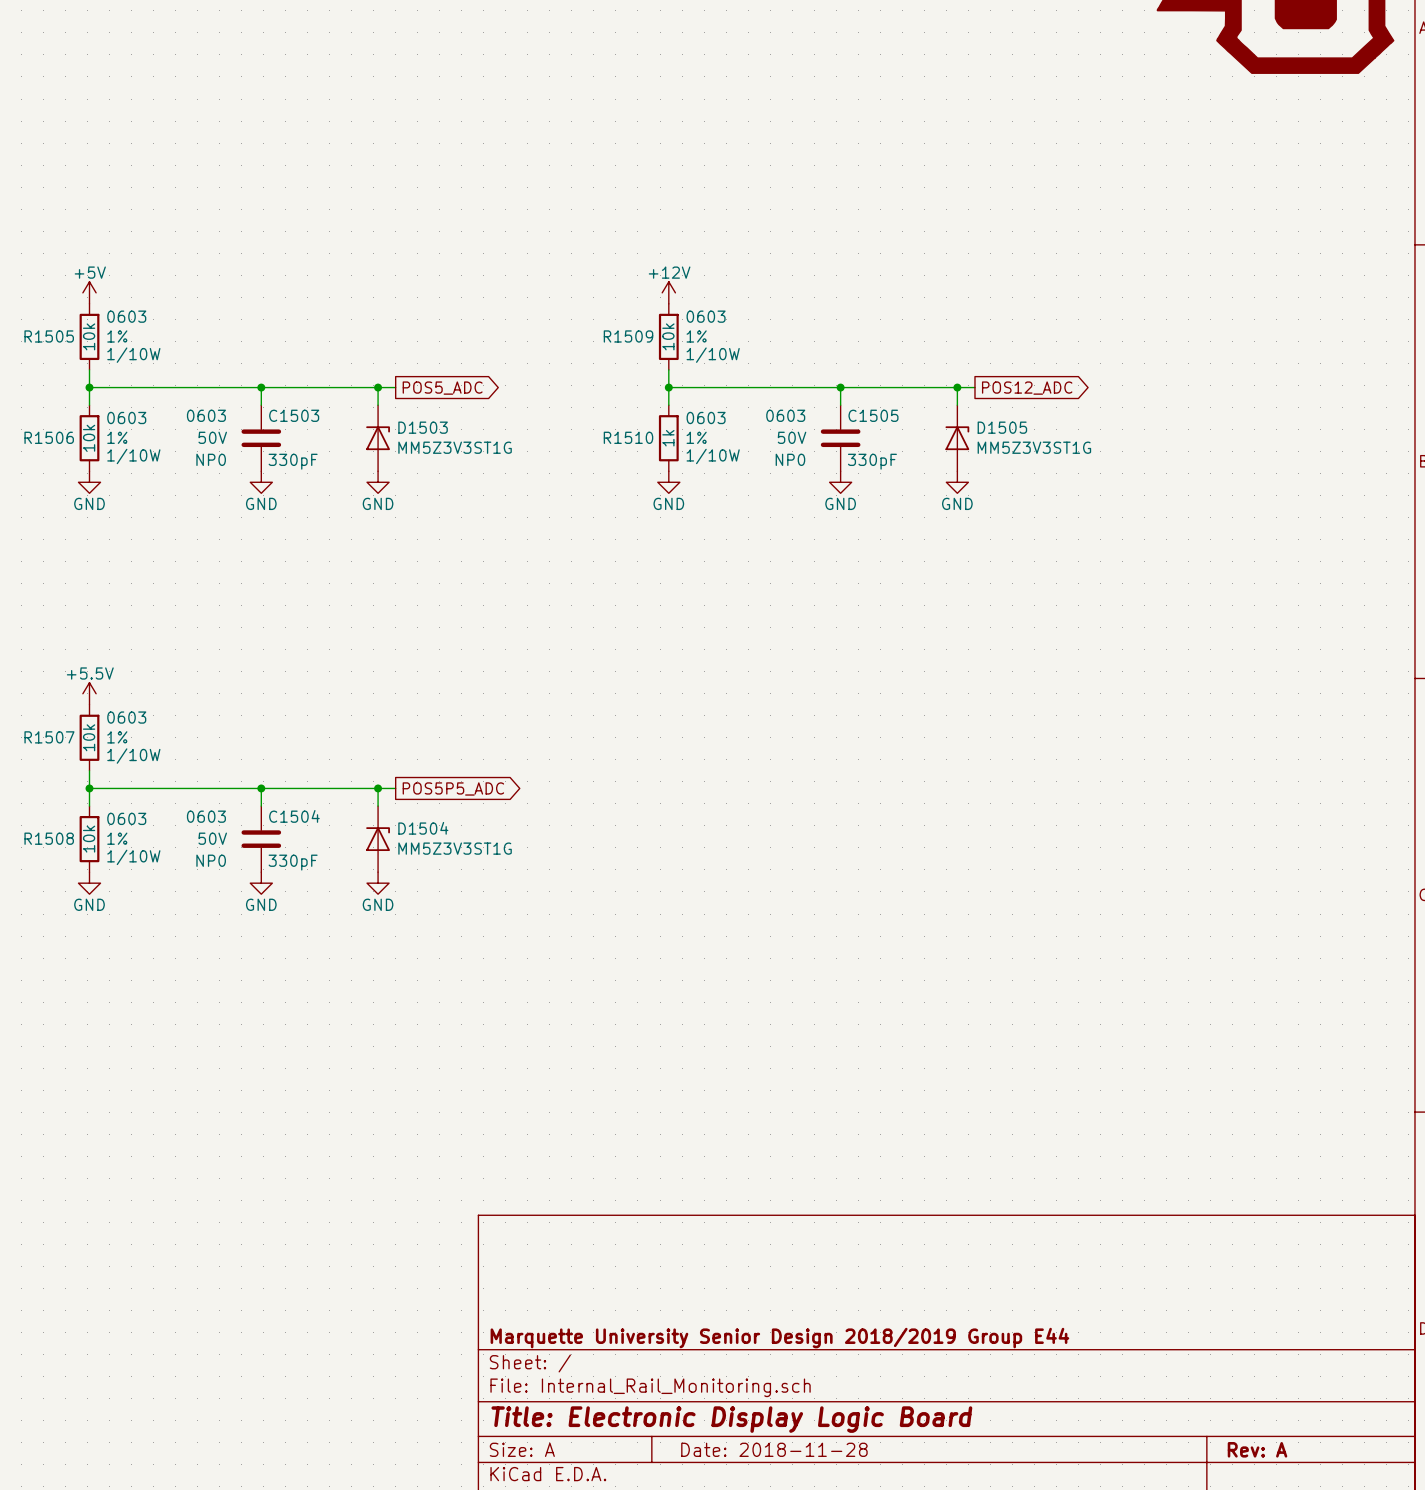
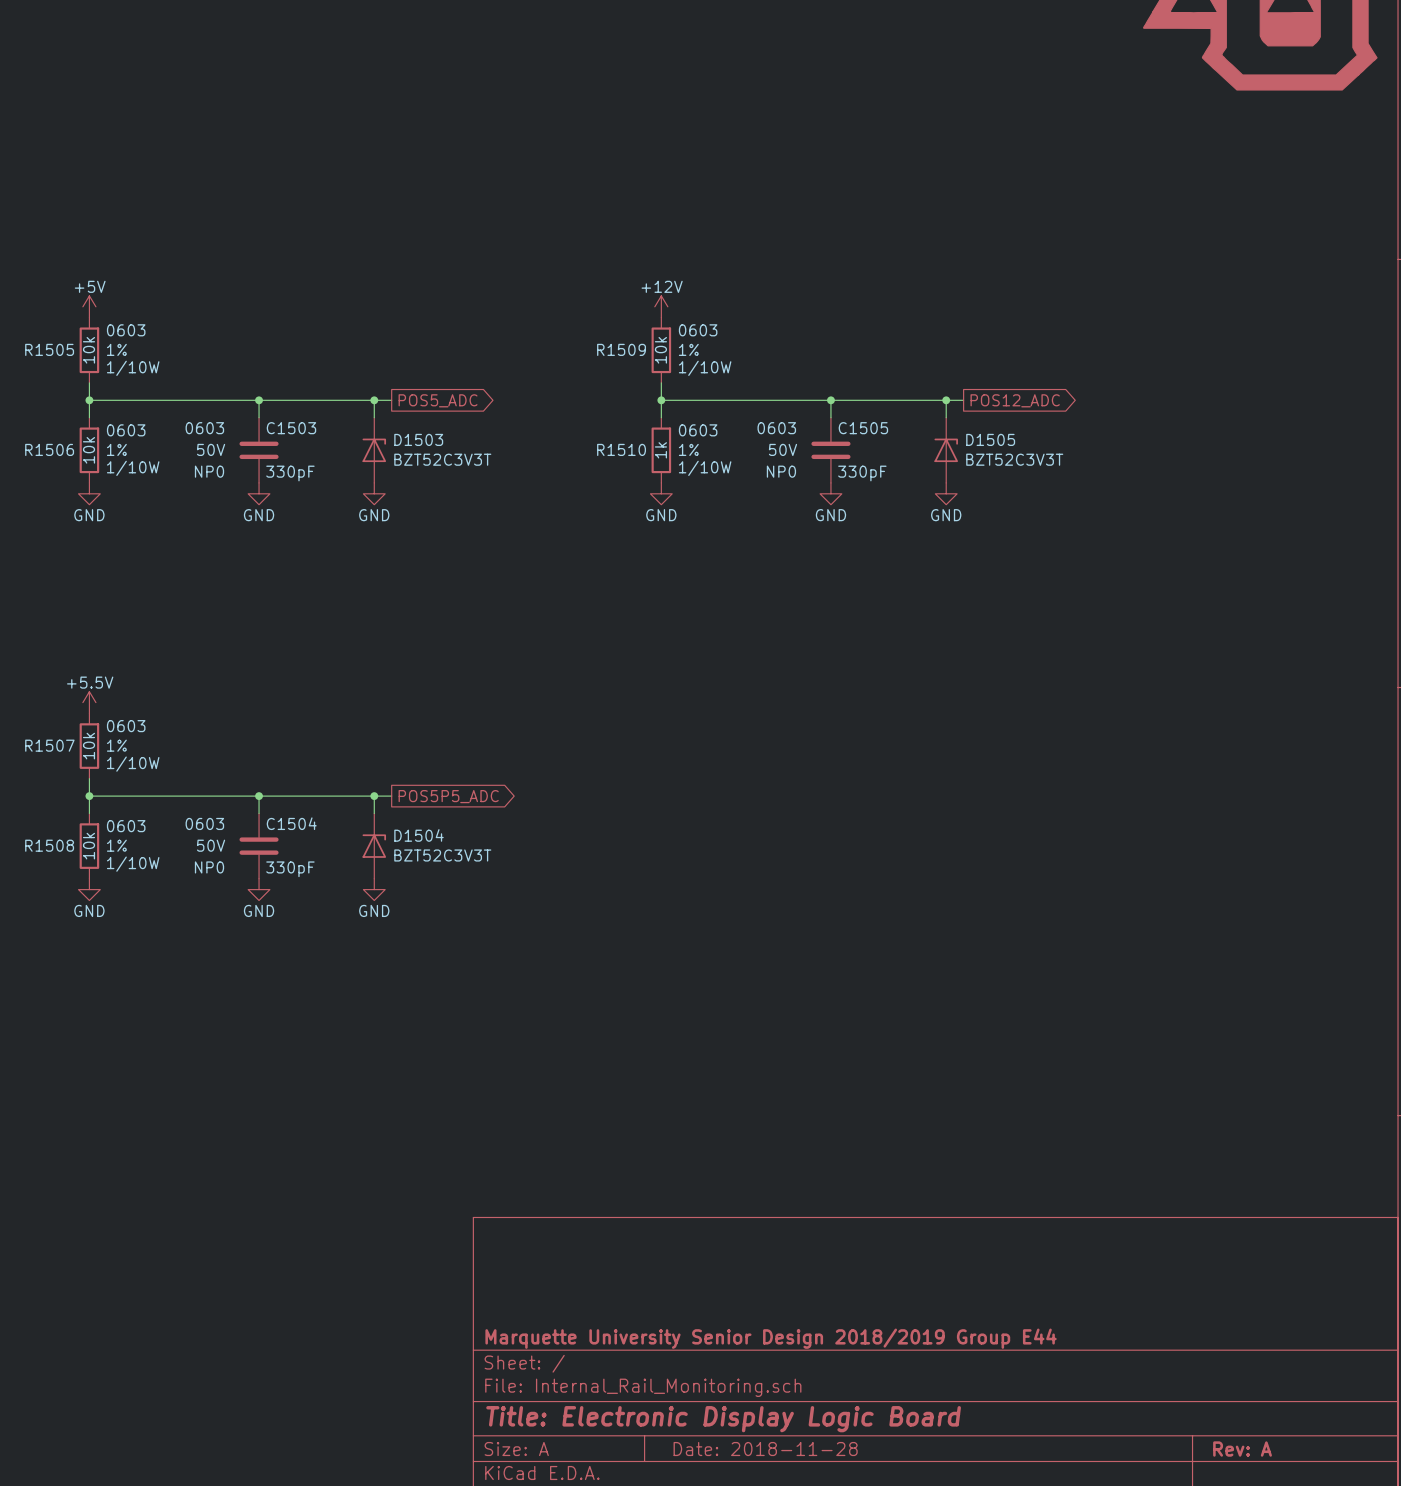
D1503 value: MM5Z3V3ST1G (455, 447) -> BZT52C3V3T (442, 459)
D1505 value: MM5Z3V3ST1G (1034, 447) -> BZT52C3V3T (1014, 459)
D1504 value: MM5Z3V3ST1G (455, 848) -> BZT52C3V3T (442, 855)

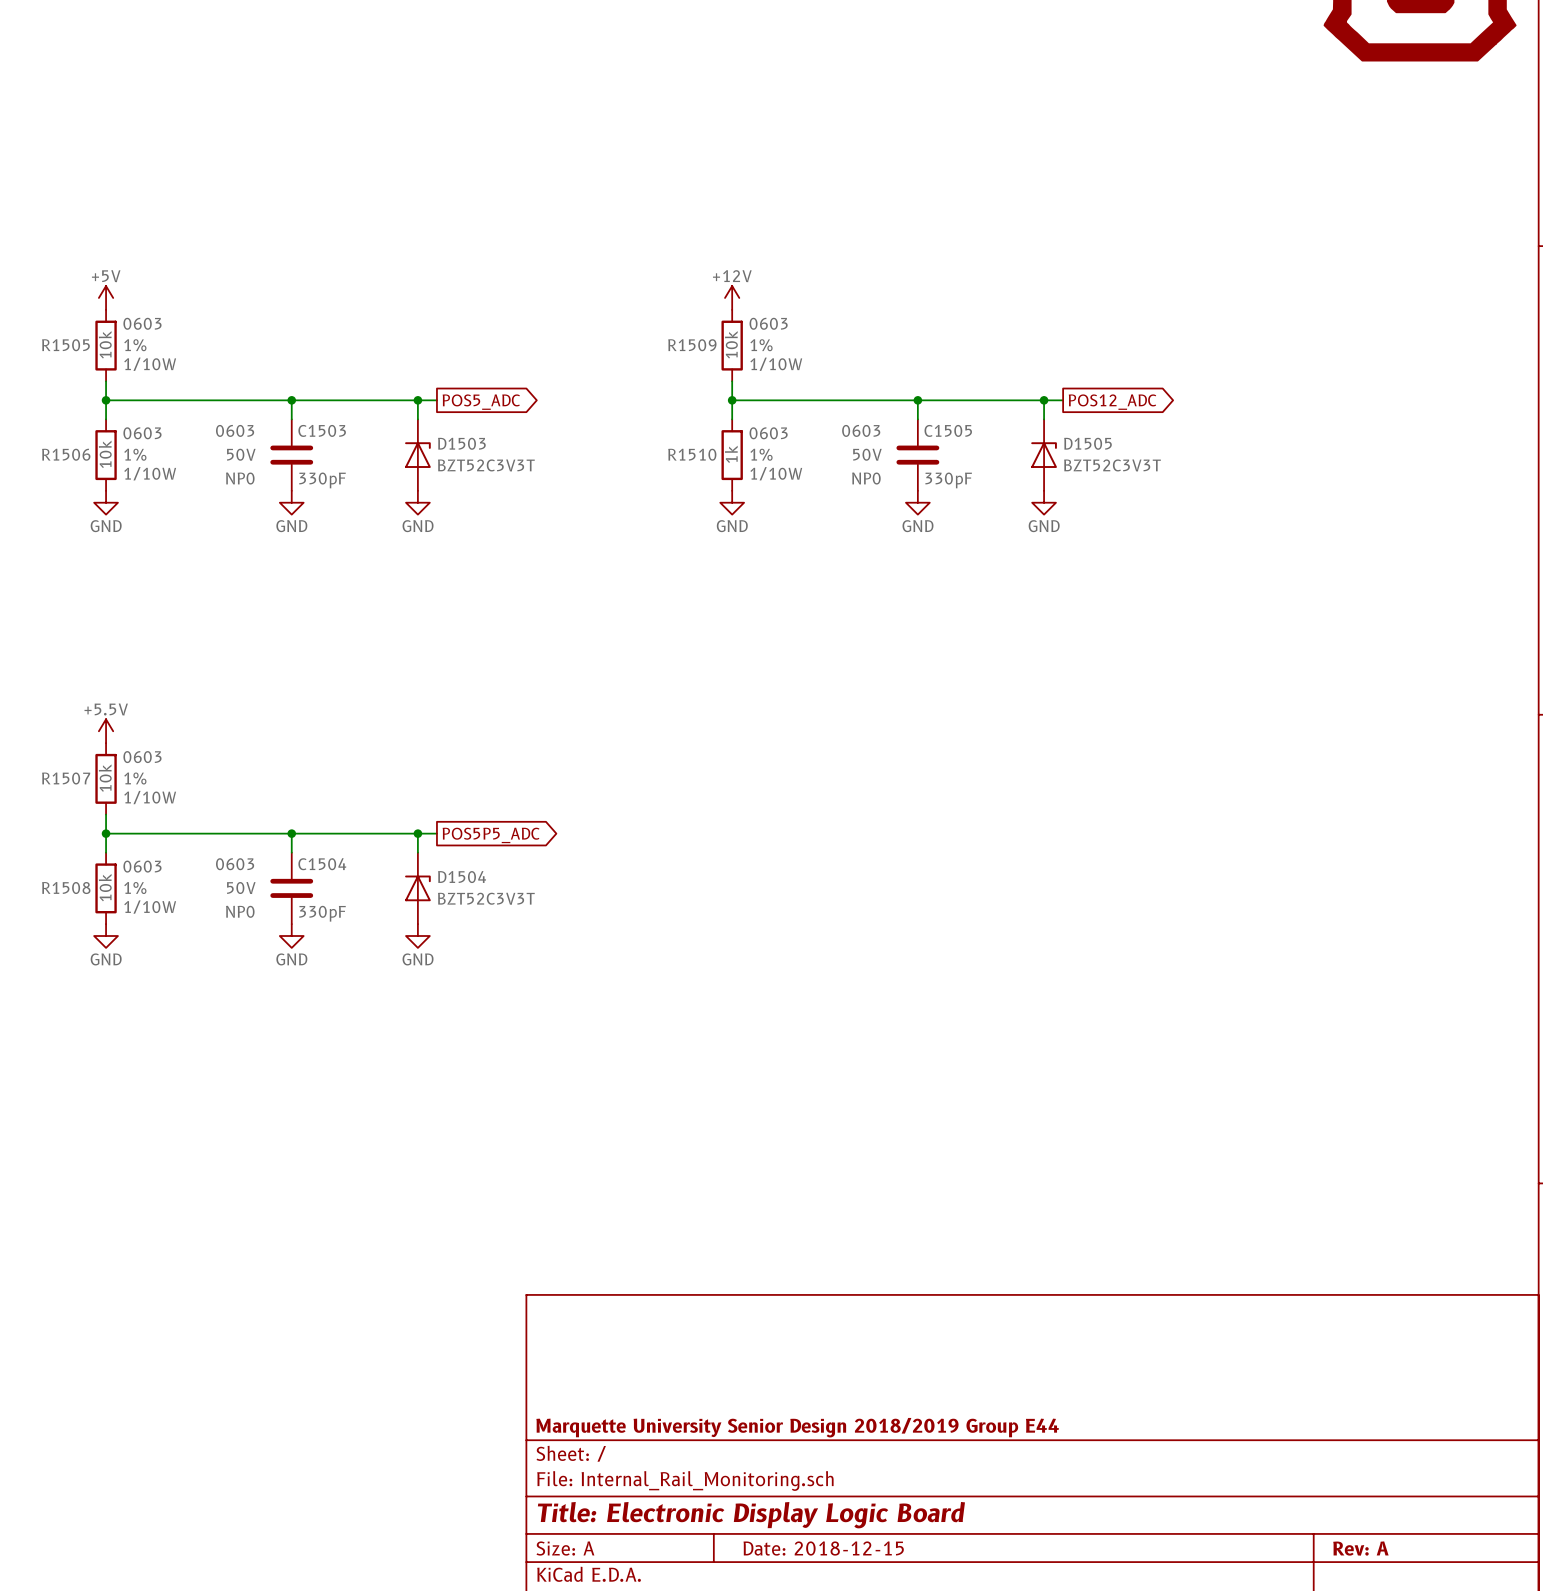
title block: Date: 2018-11-28 (765, 1449) -> Date: 2018-12-15 (823, 1548)

